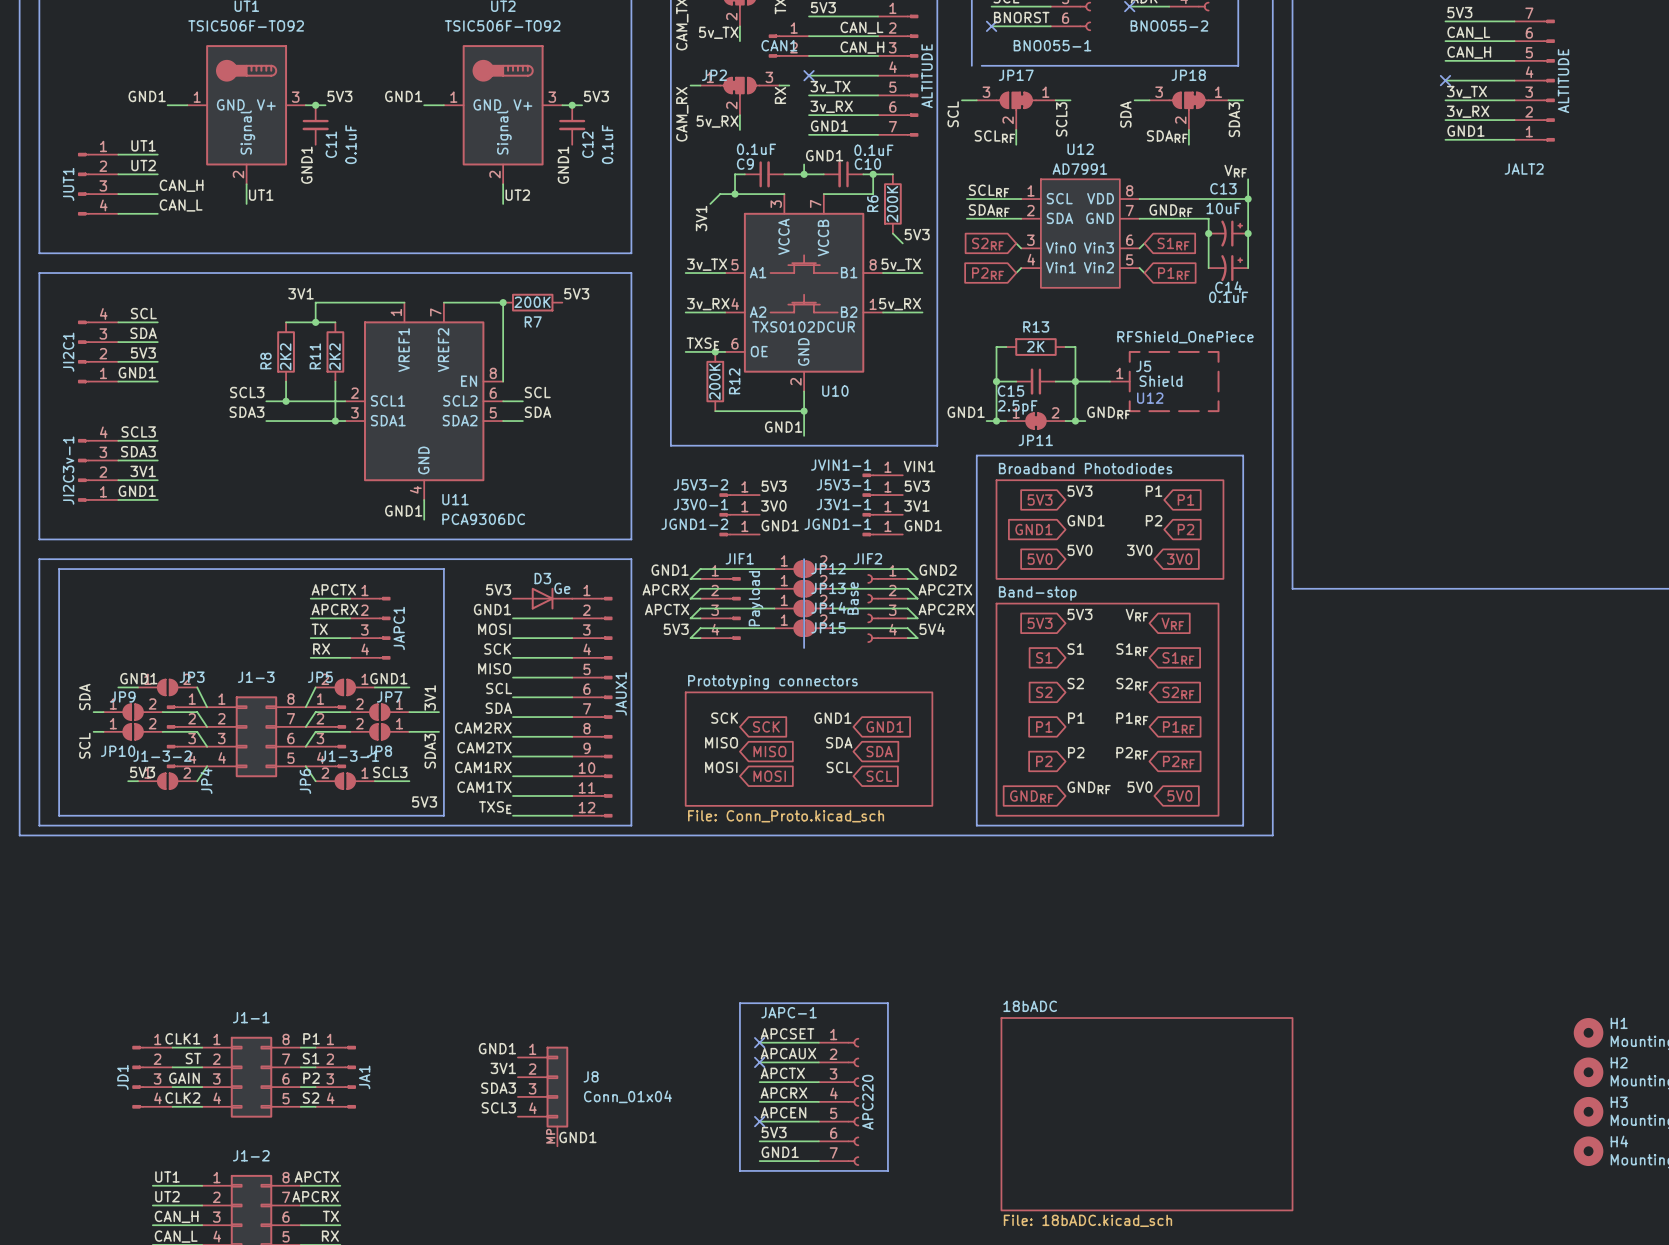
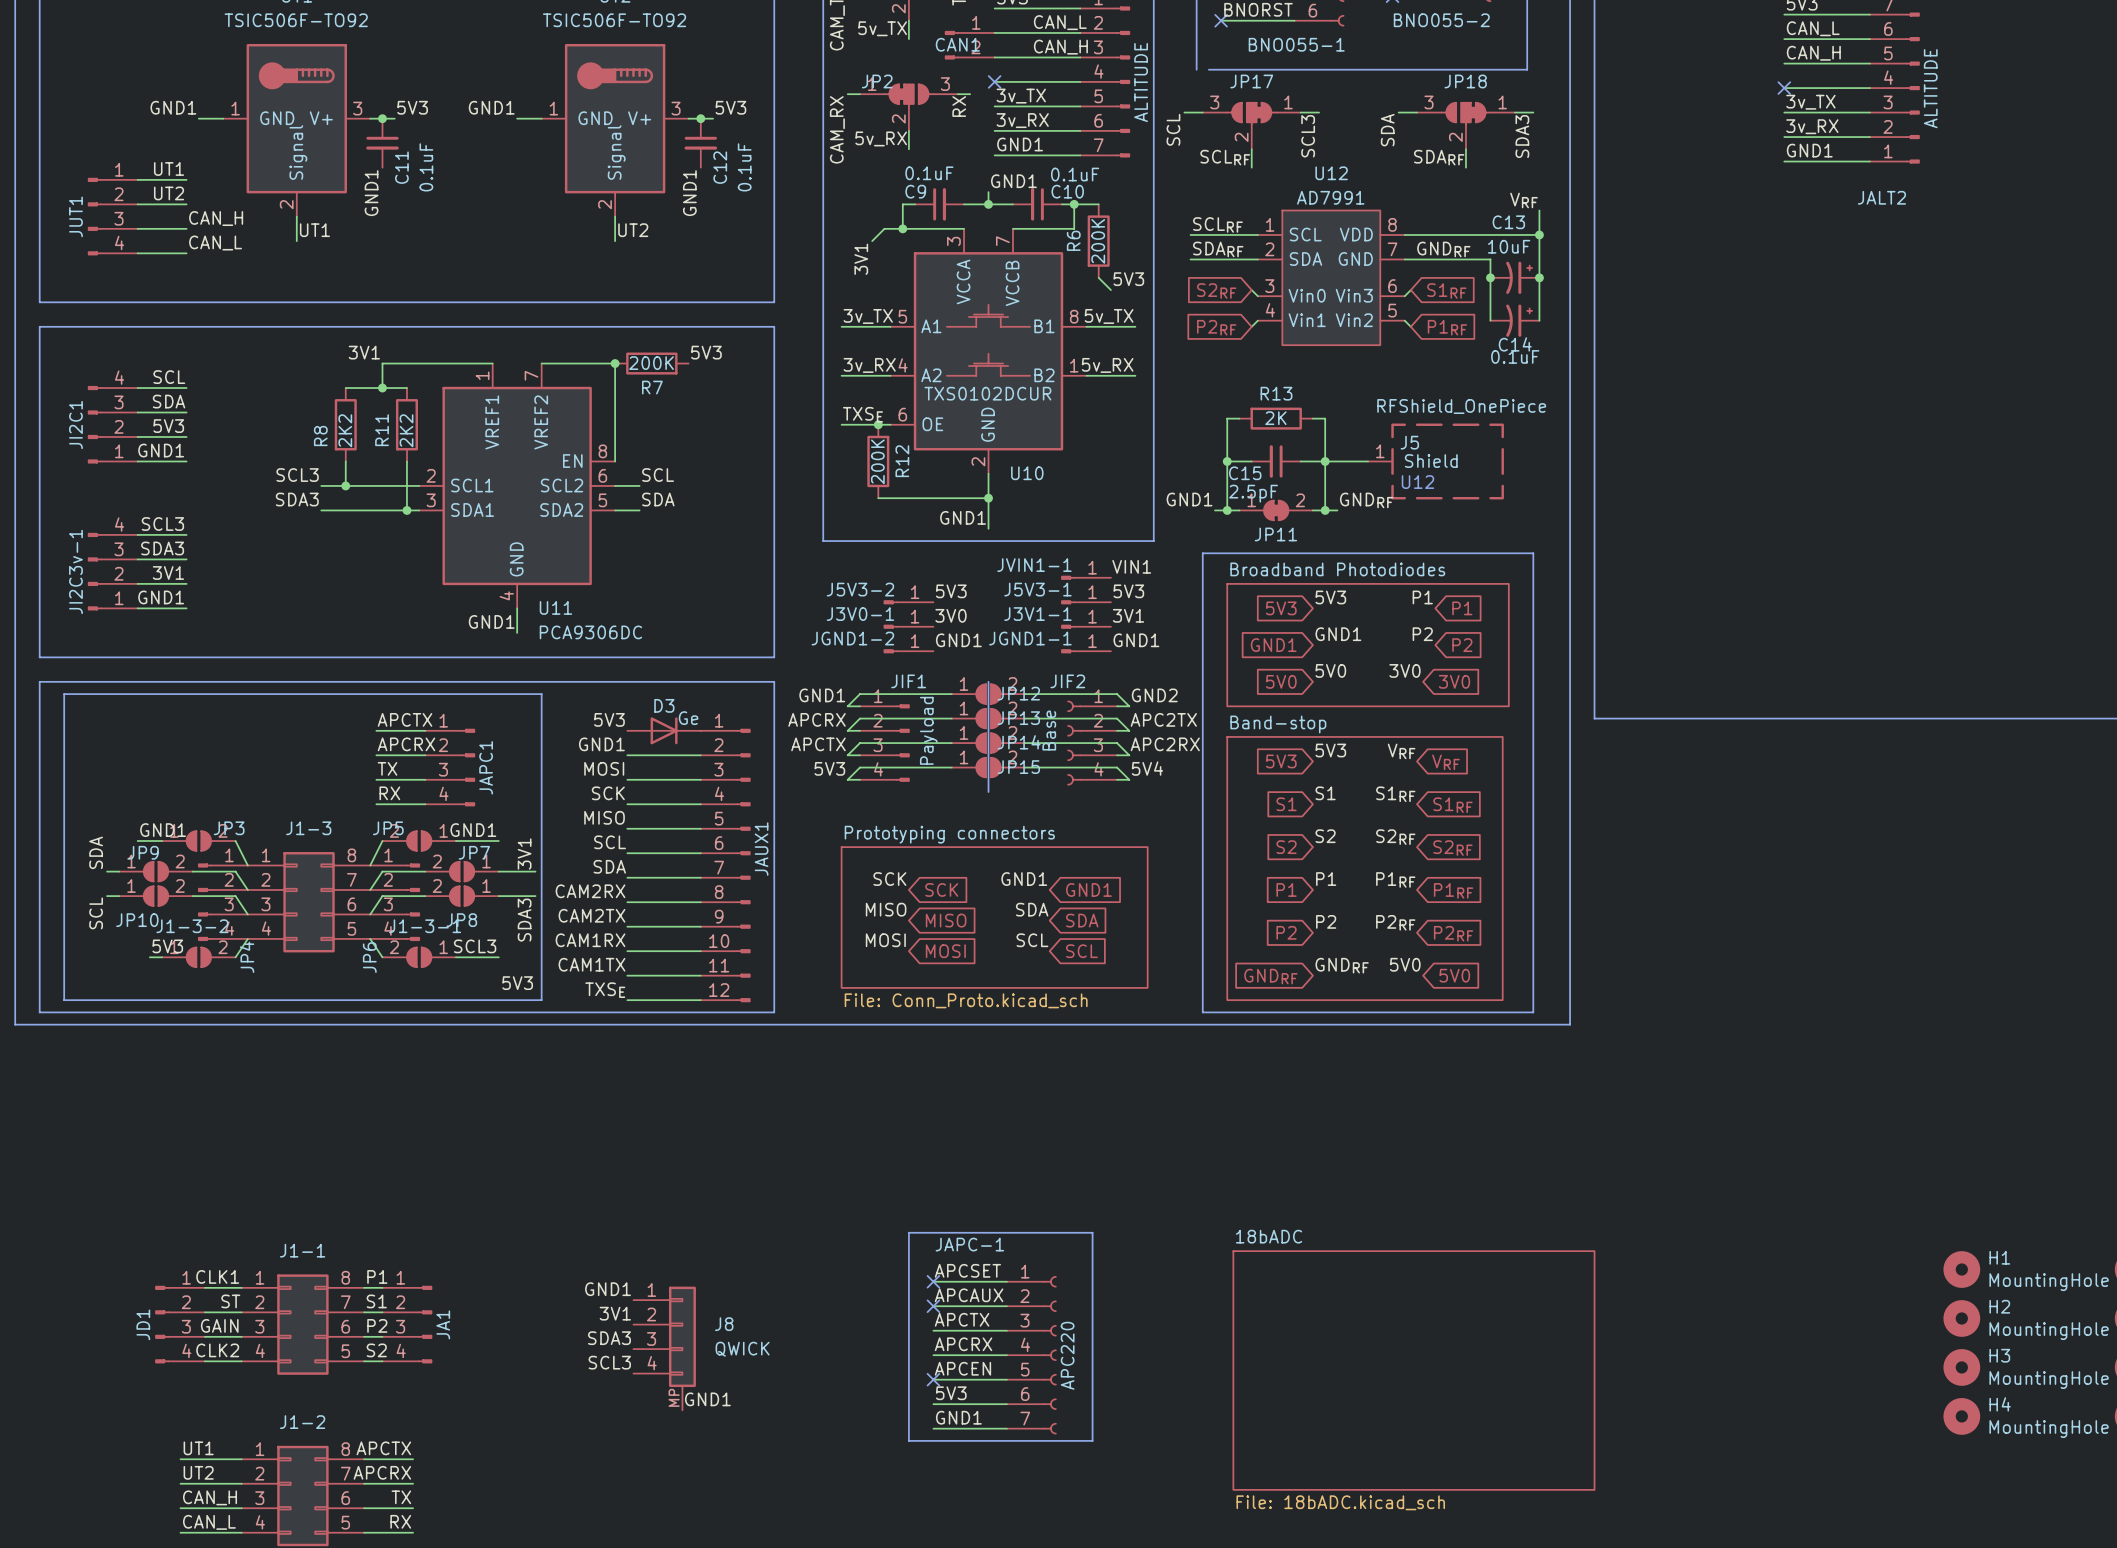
J8 value: Conn_01x04 (627, 1096) -> QWICK (742, 1349)

